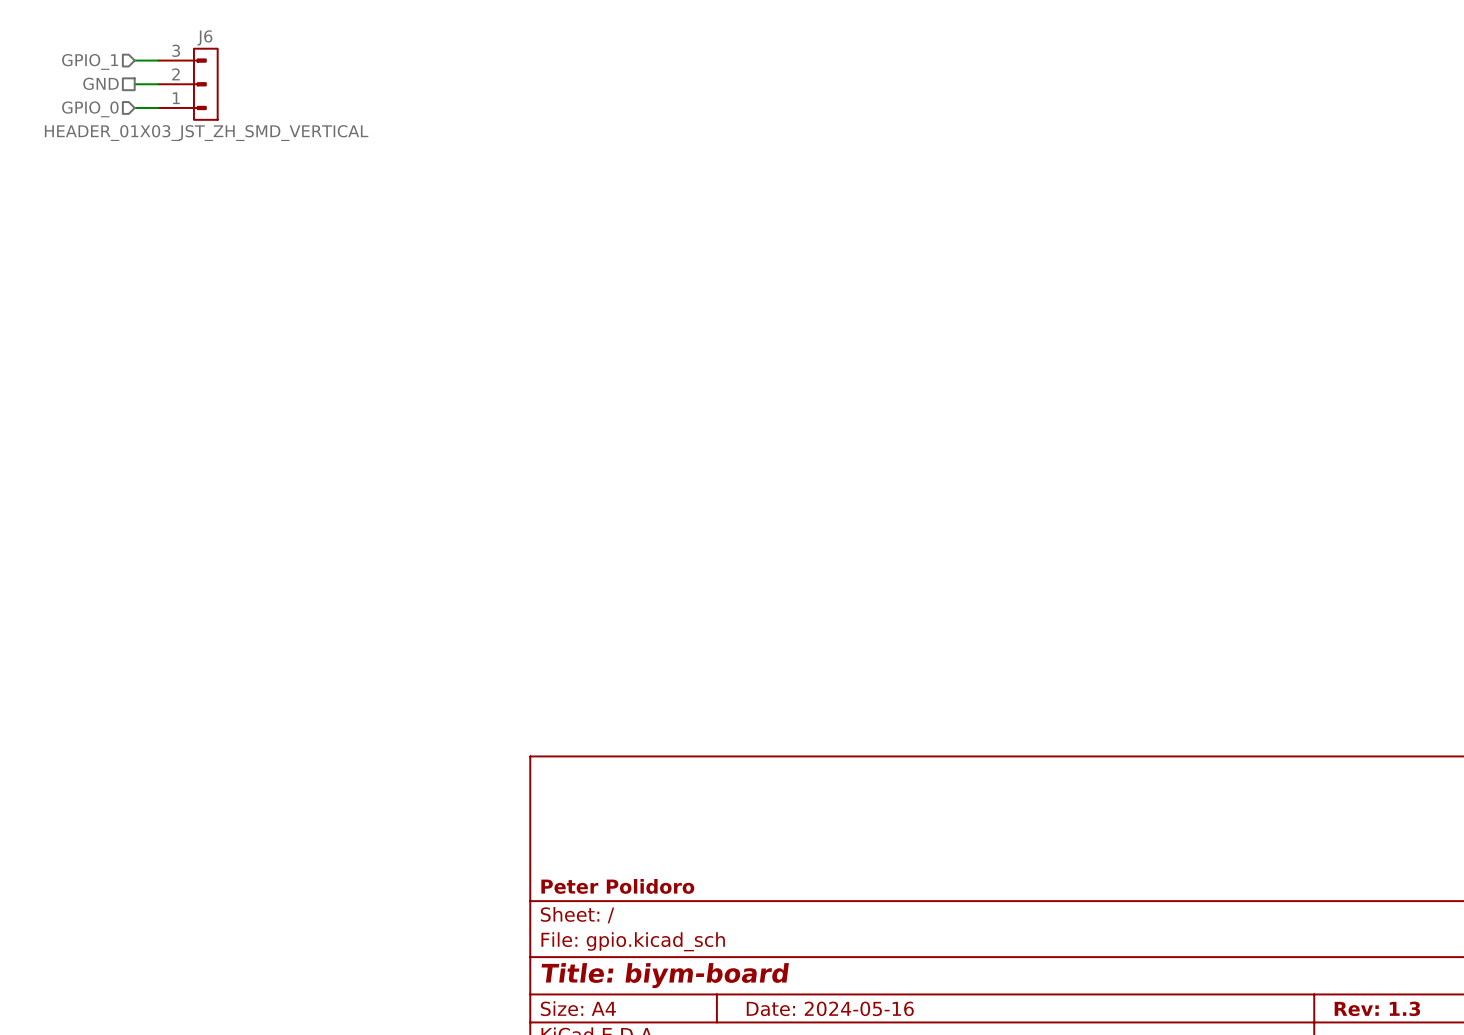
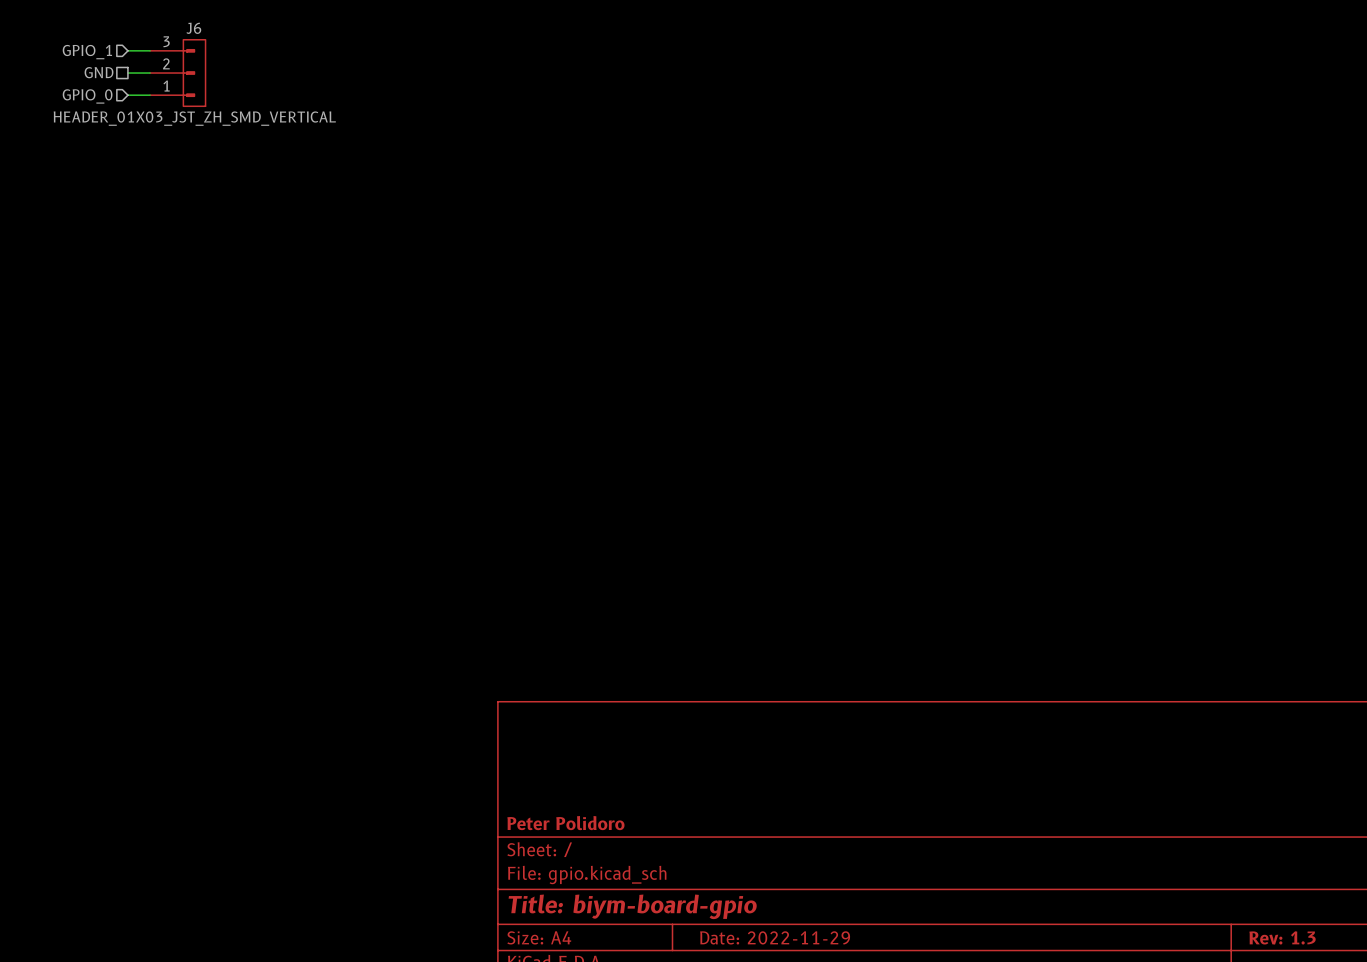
title block: Title: biym-board (665, 975) -> Title: biym-board-gpio (632, 906)
title block: Date: 2024-05-16 (830, 1008) -> Date: 2022-11-29 (775, 937)

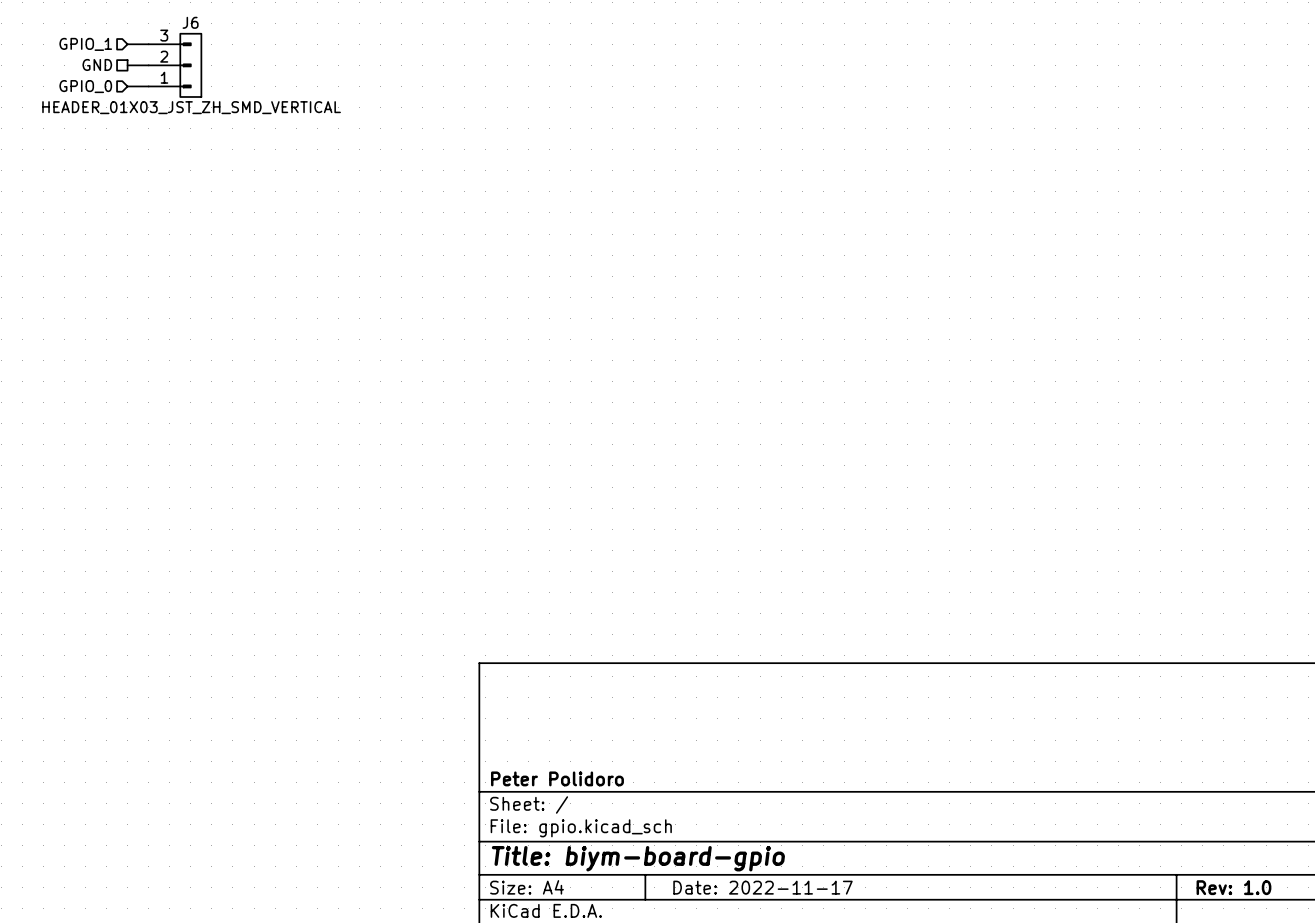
title block: Date: 2022-11-29 (775, 937) -> Date: 2022-11-17 (763, 887)
title block: Rev: 1.3 (1282, 937) -> Rev: 1.0 (1233, 887)

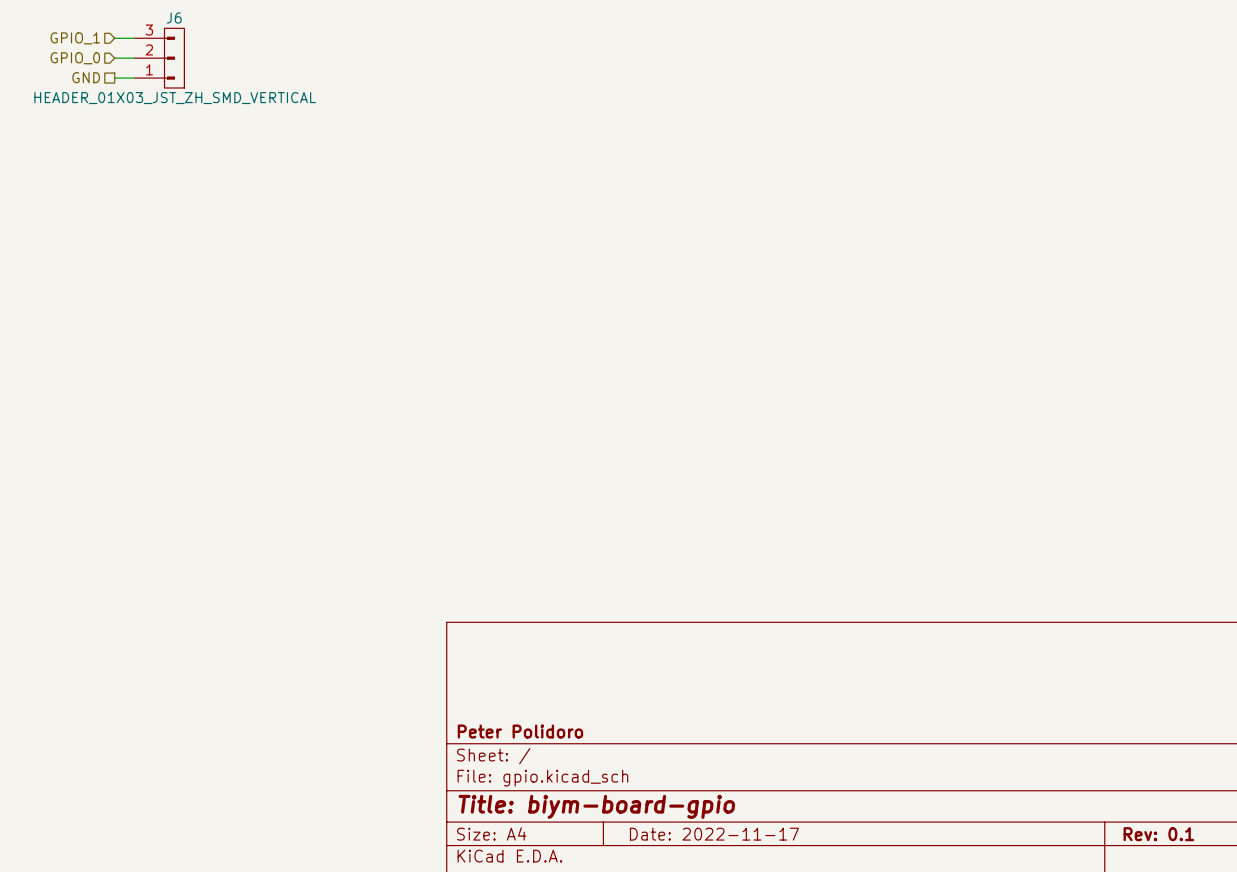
hierarchical label shape: passive (97, 64) -> input (75, 58)
hierarchical label: GND (97, 64) -> GPIO_0 (75, 58)
hierarchical label shape: input (85, 86) -> passive (86, 77)
hierarchical label: GPIO_0 (85, 86) -> GND (86, 77)
title block: Rev: 1.0 (1233, 887) -> Rev: 0.1 (1158, 834)

